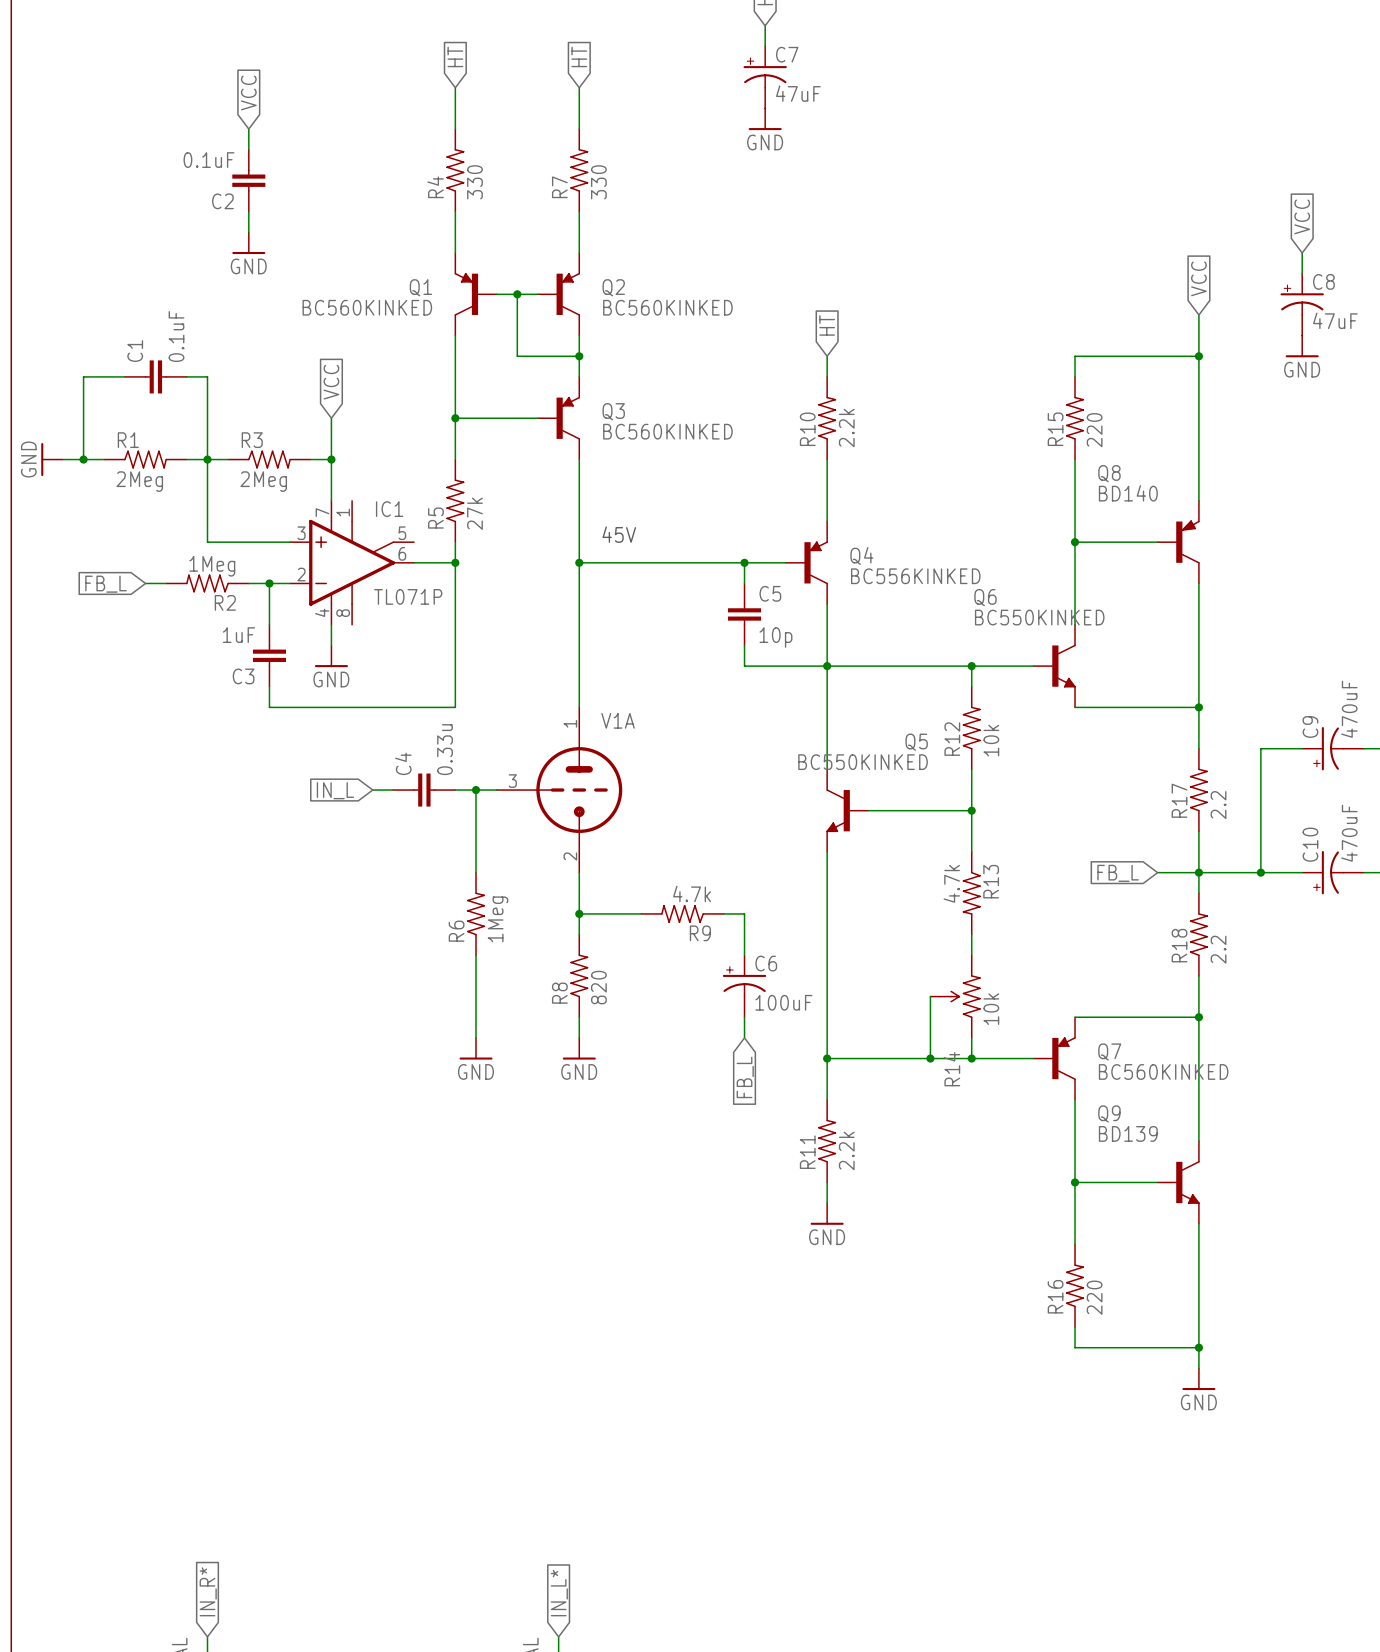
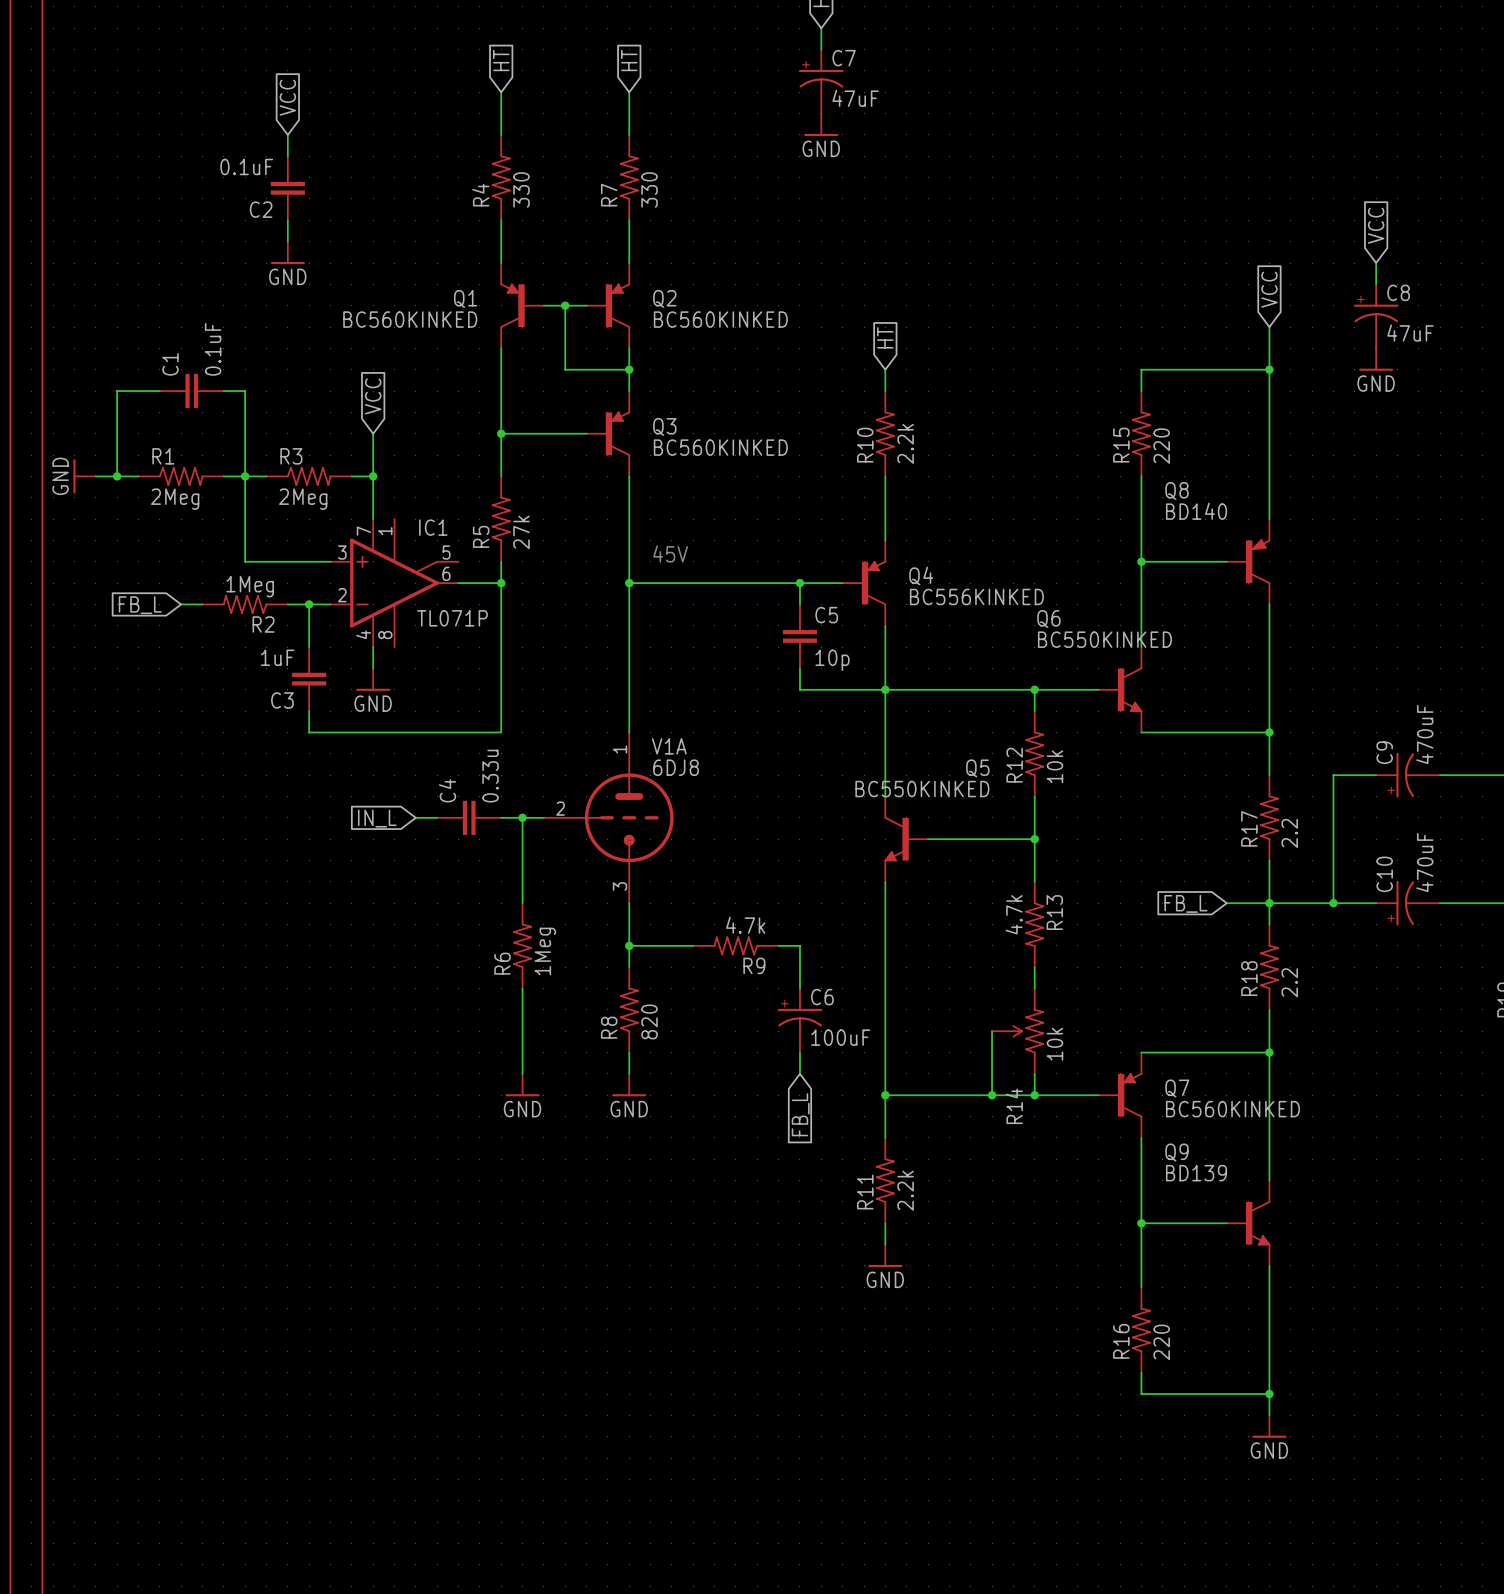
V1A value: none -> 6DJ8 (676, 767)
V1A pin number: 3 (512, 781) -> 2 (560, 808)
V1A pin number: 2 (570, 856) -> 3 (620, 886)

